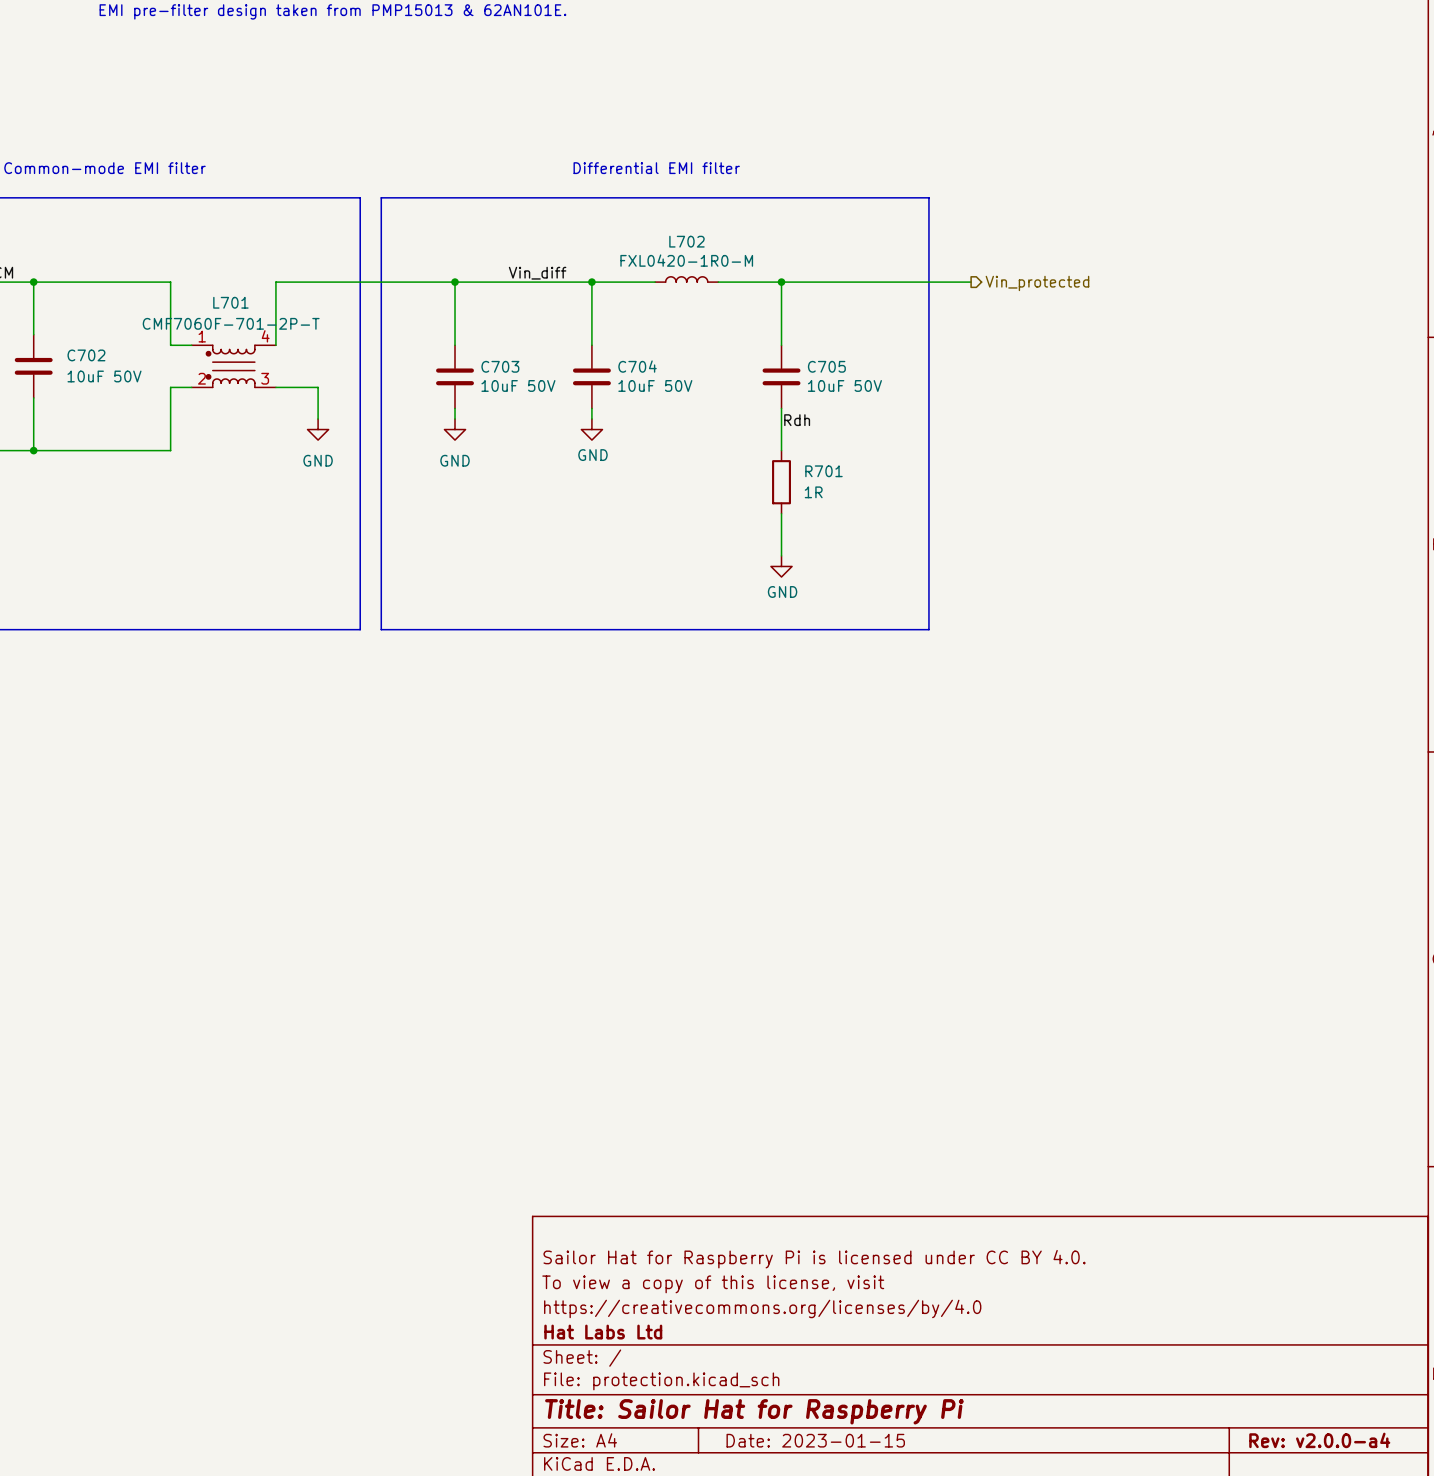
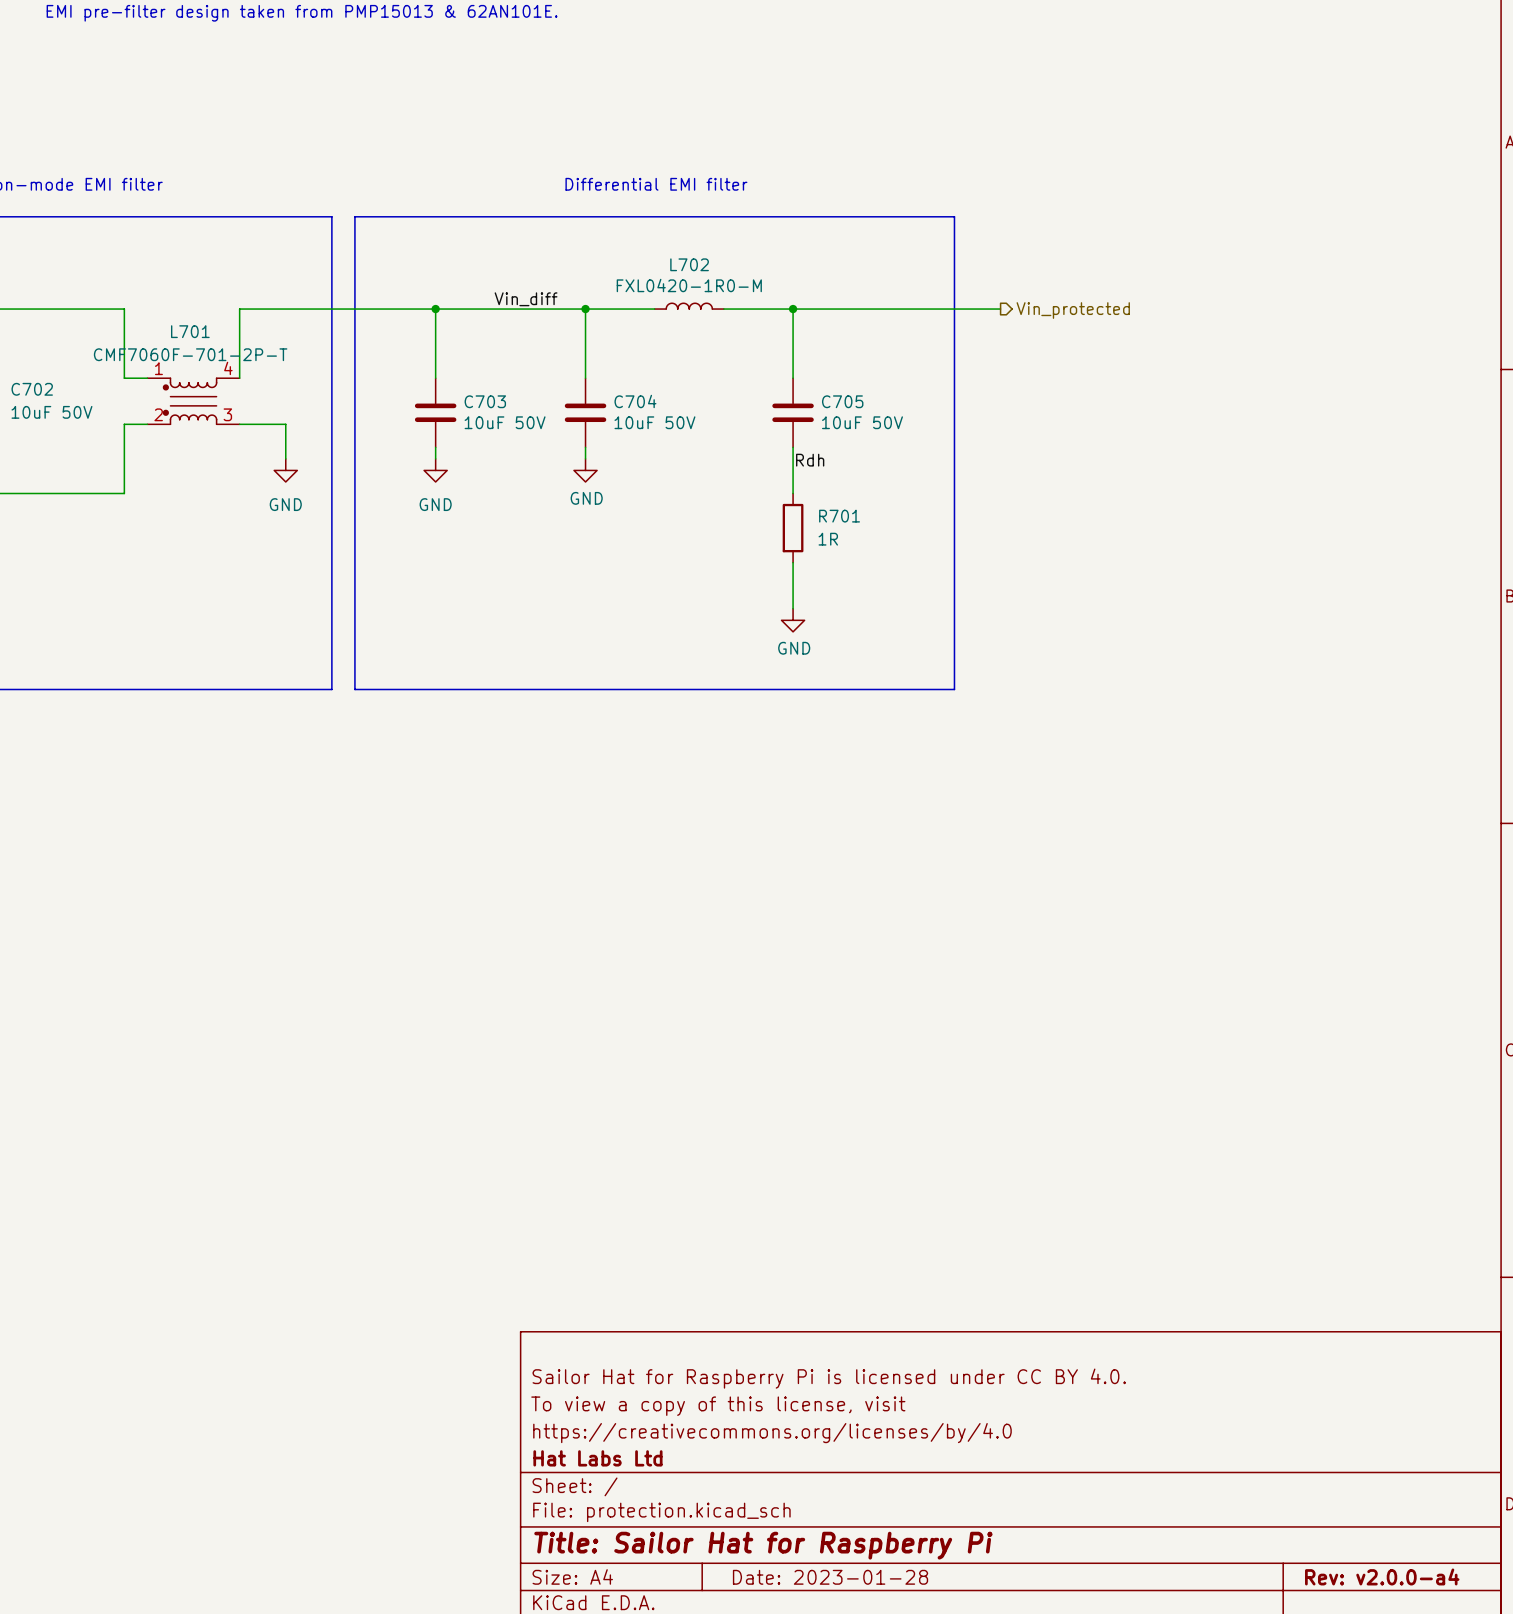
title block: Date: 2023-01-15 (815, 1440) -> Date: 2023-01-28 (830, 1577)

